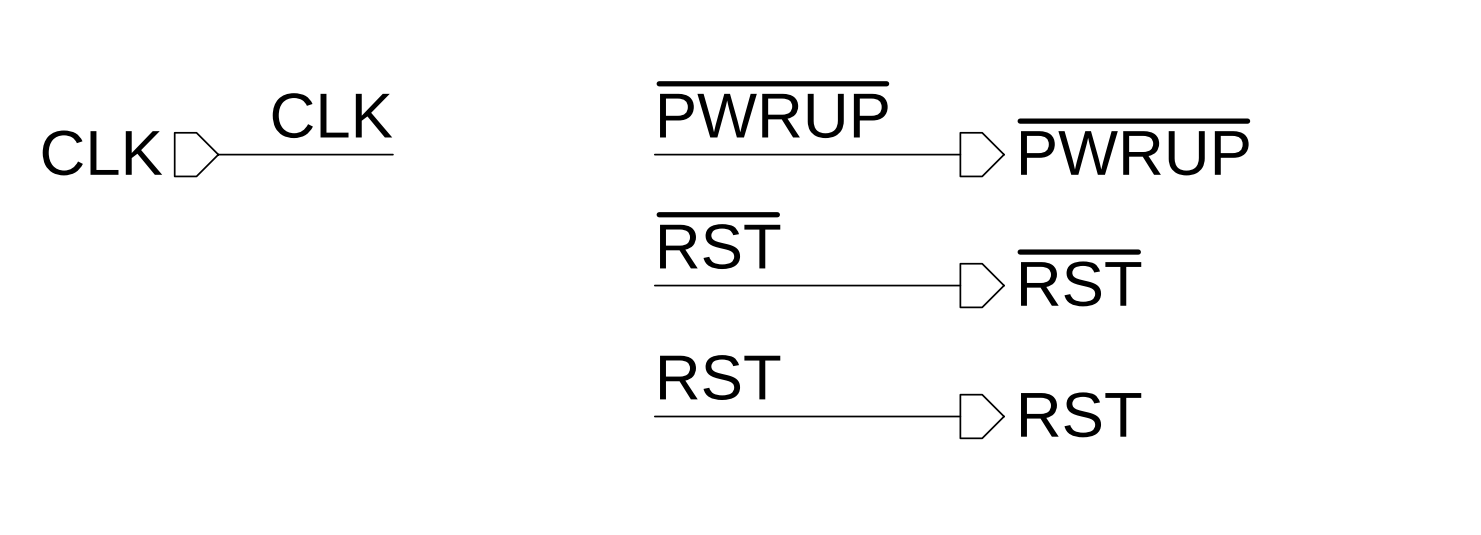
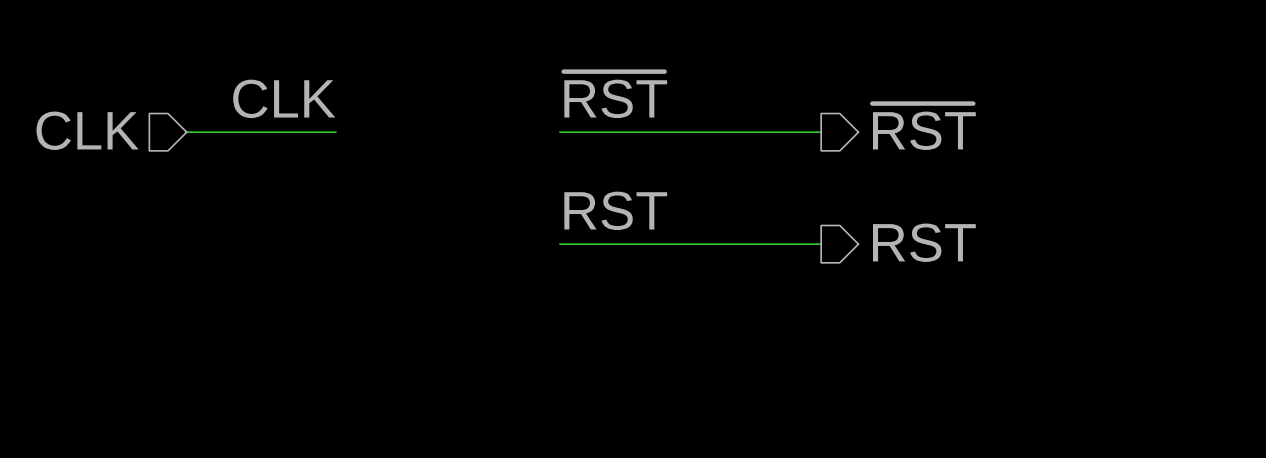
label: ~{PWRUP} (773, 110) -> ~{RST} (615, 94)
hierarchical label: ~{PWRUP} (1134, 148) -> ~{RST} (924, 126)
label: ~{RST} (719, 241) -> RST (615, 210)
hierarchical label: ~{RST} (1080, 279) -> RST (924, 242)
label: RST (720, 377) -> none
hierarchical label: RST (1081, 414) -> none
wire: (654, 416) (960, 416) -> none

